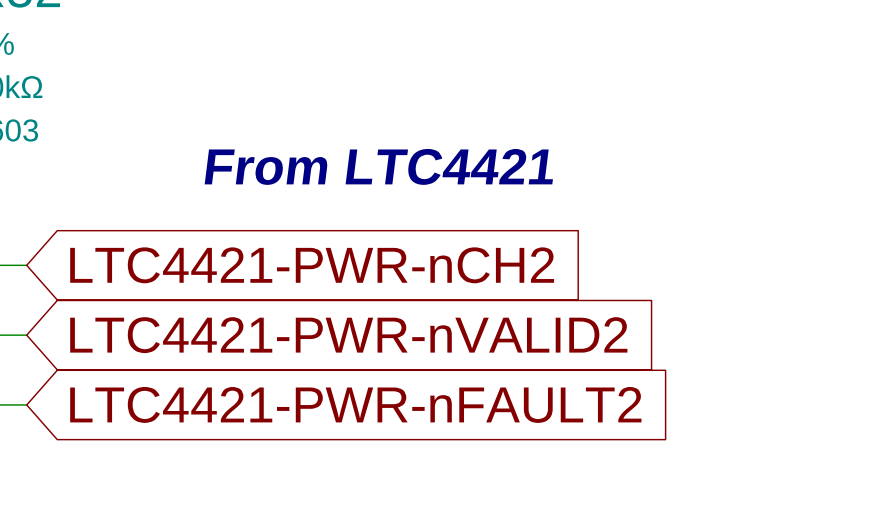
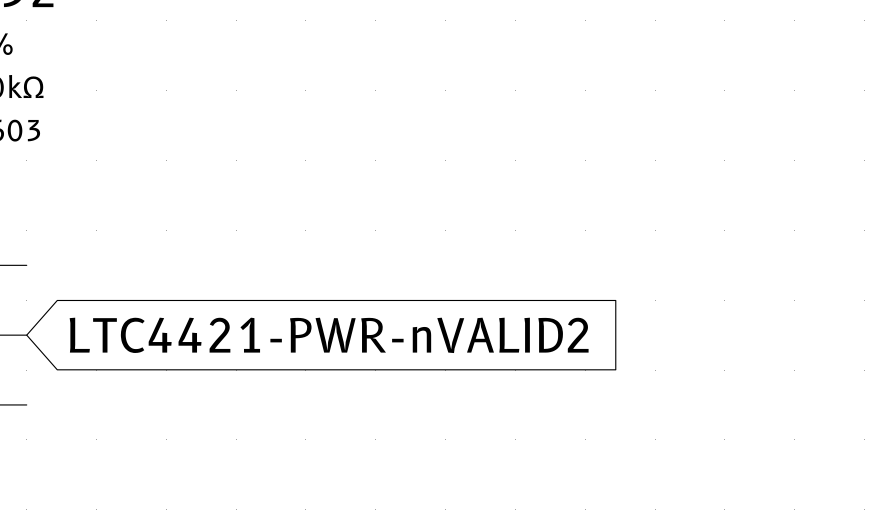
text: From LTC4421 (378, 166) -> none
global label: LTC4421-PWR-nCH2 (312, 265) -> none
global label: LTC4421-PWR-nFAULT2 (355, 404) -> none

